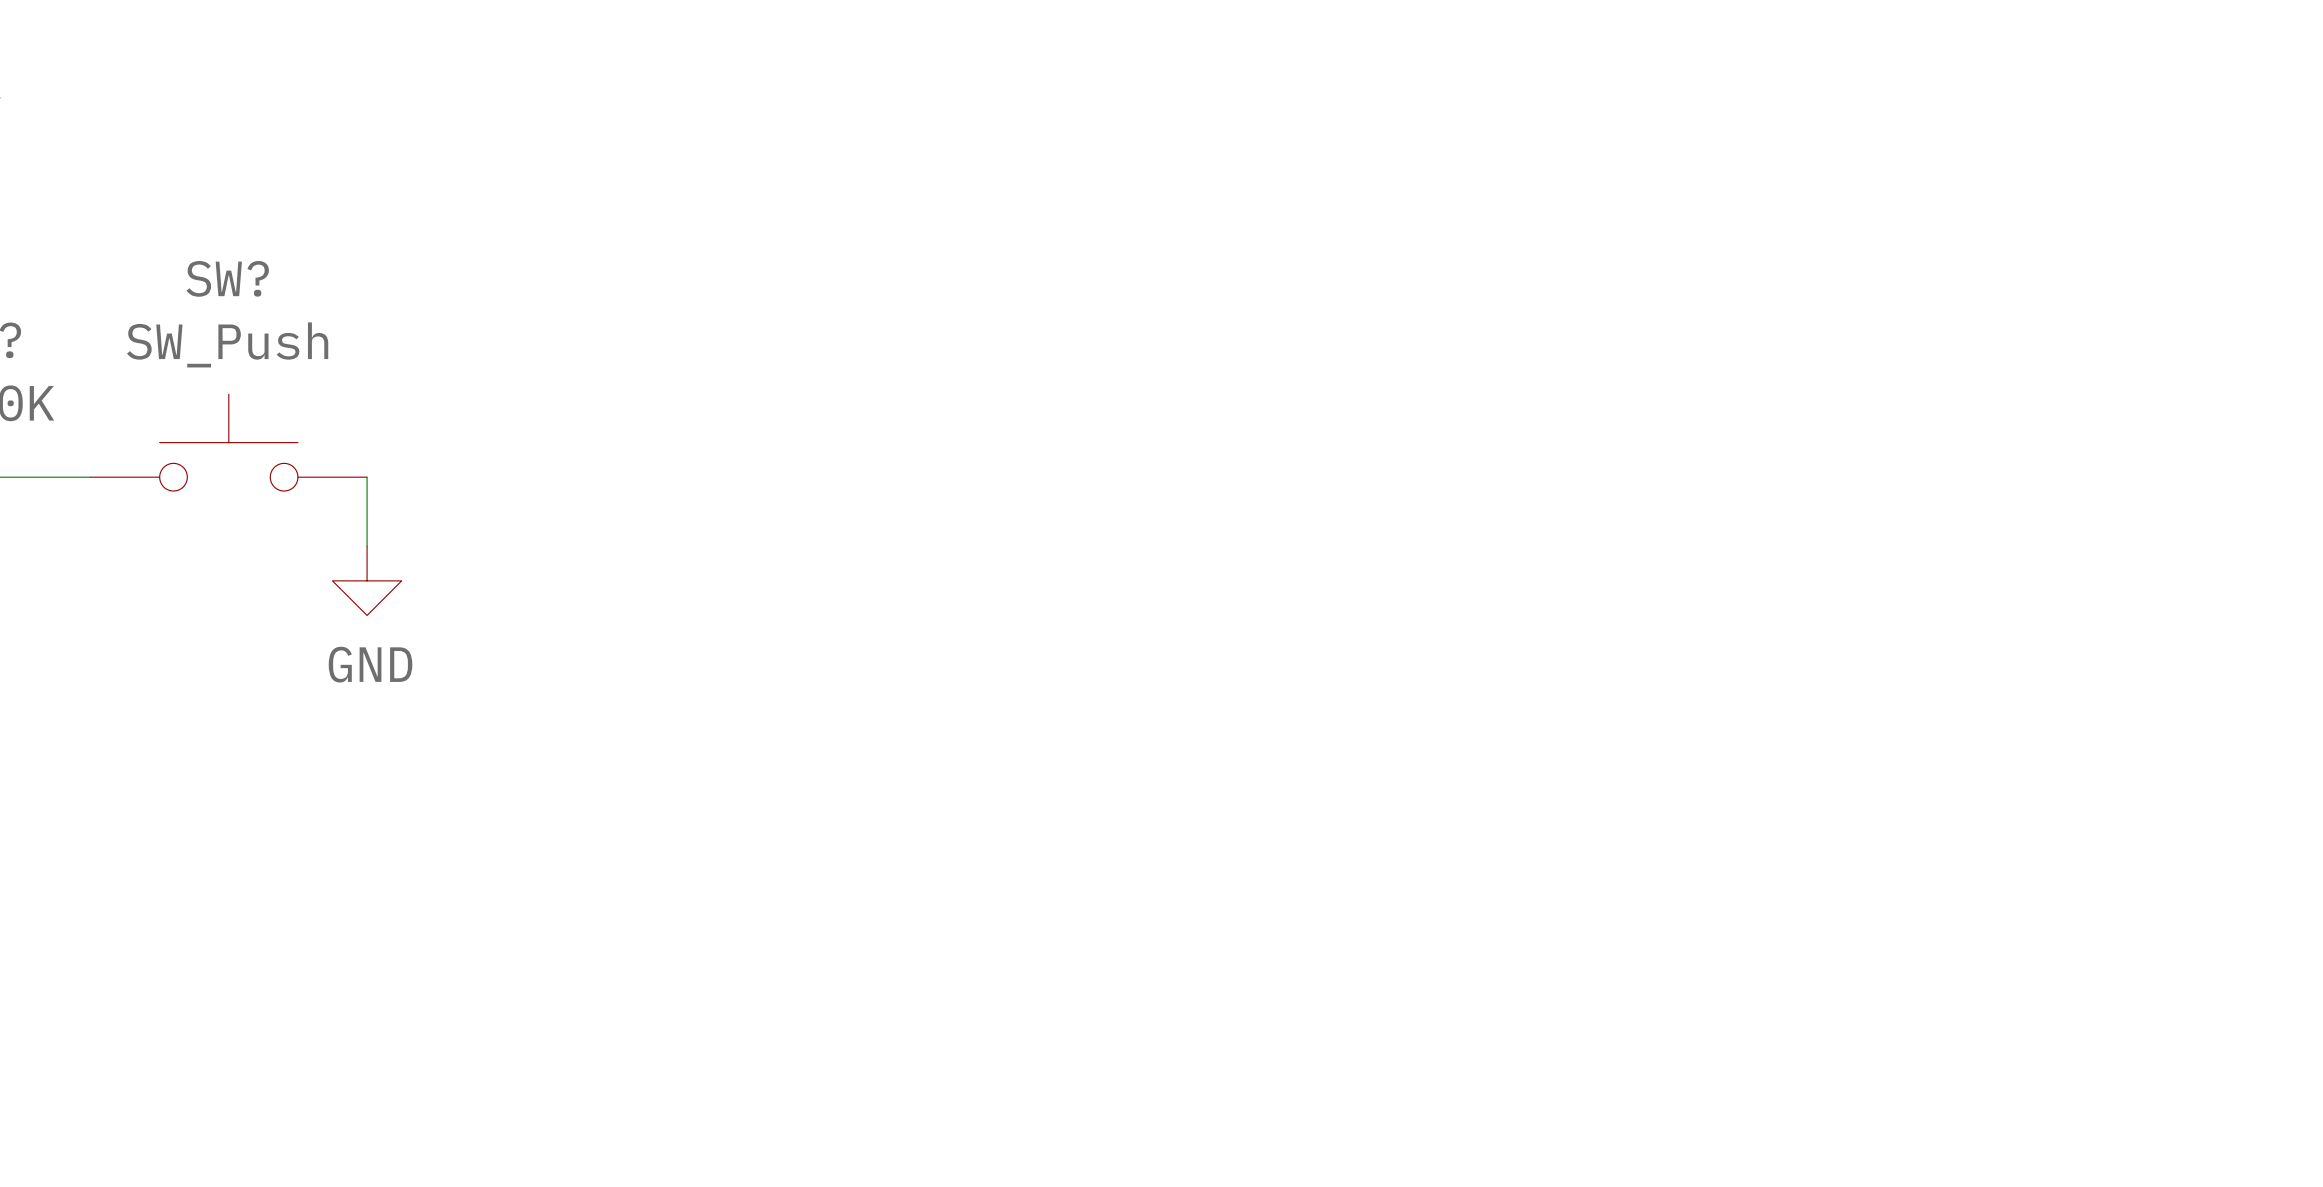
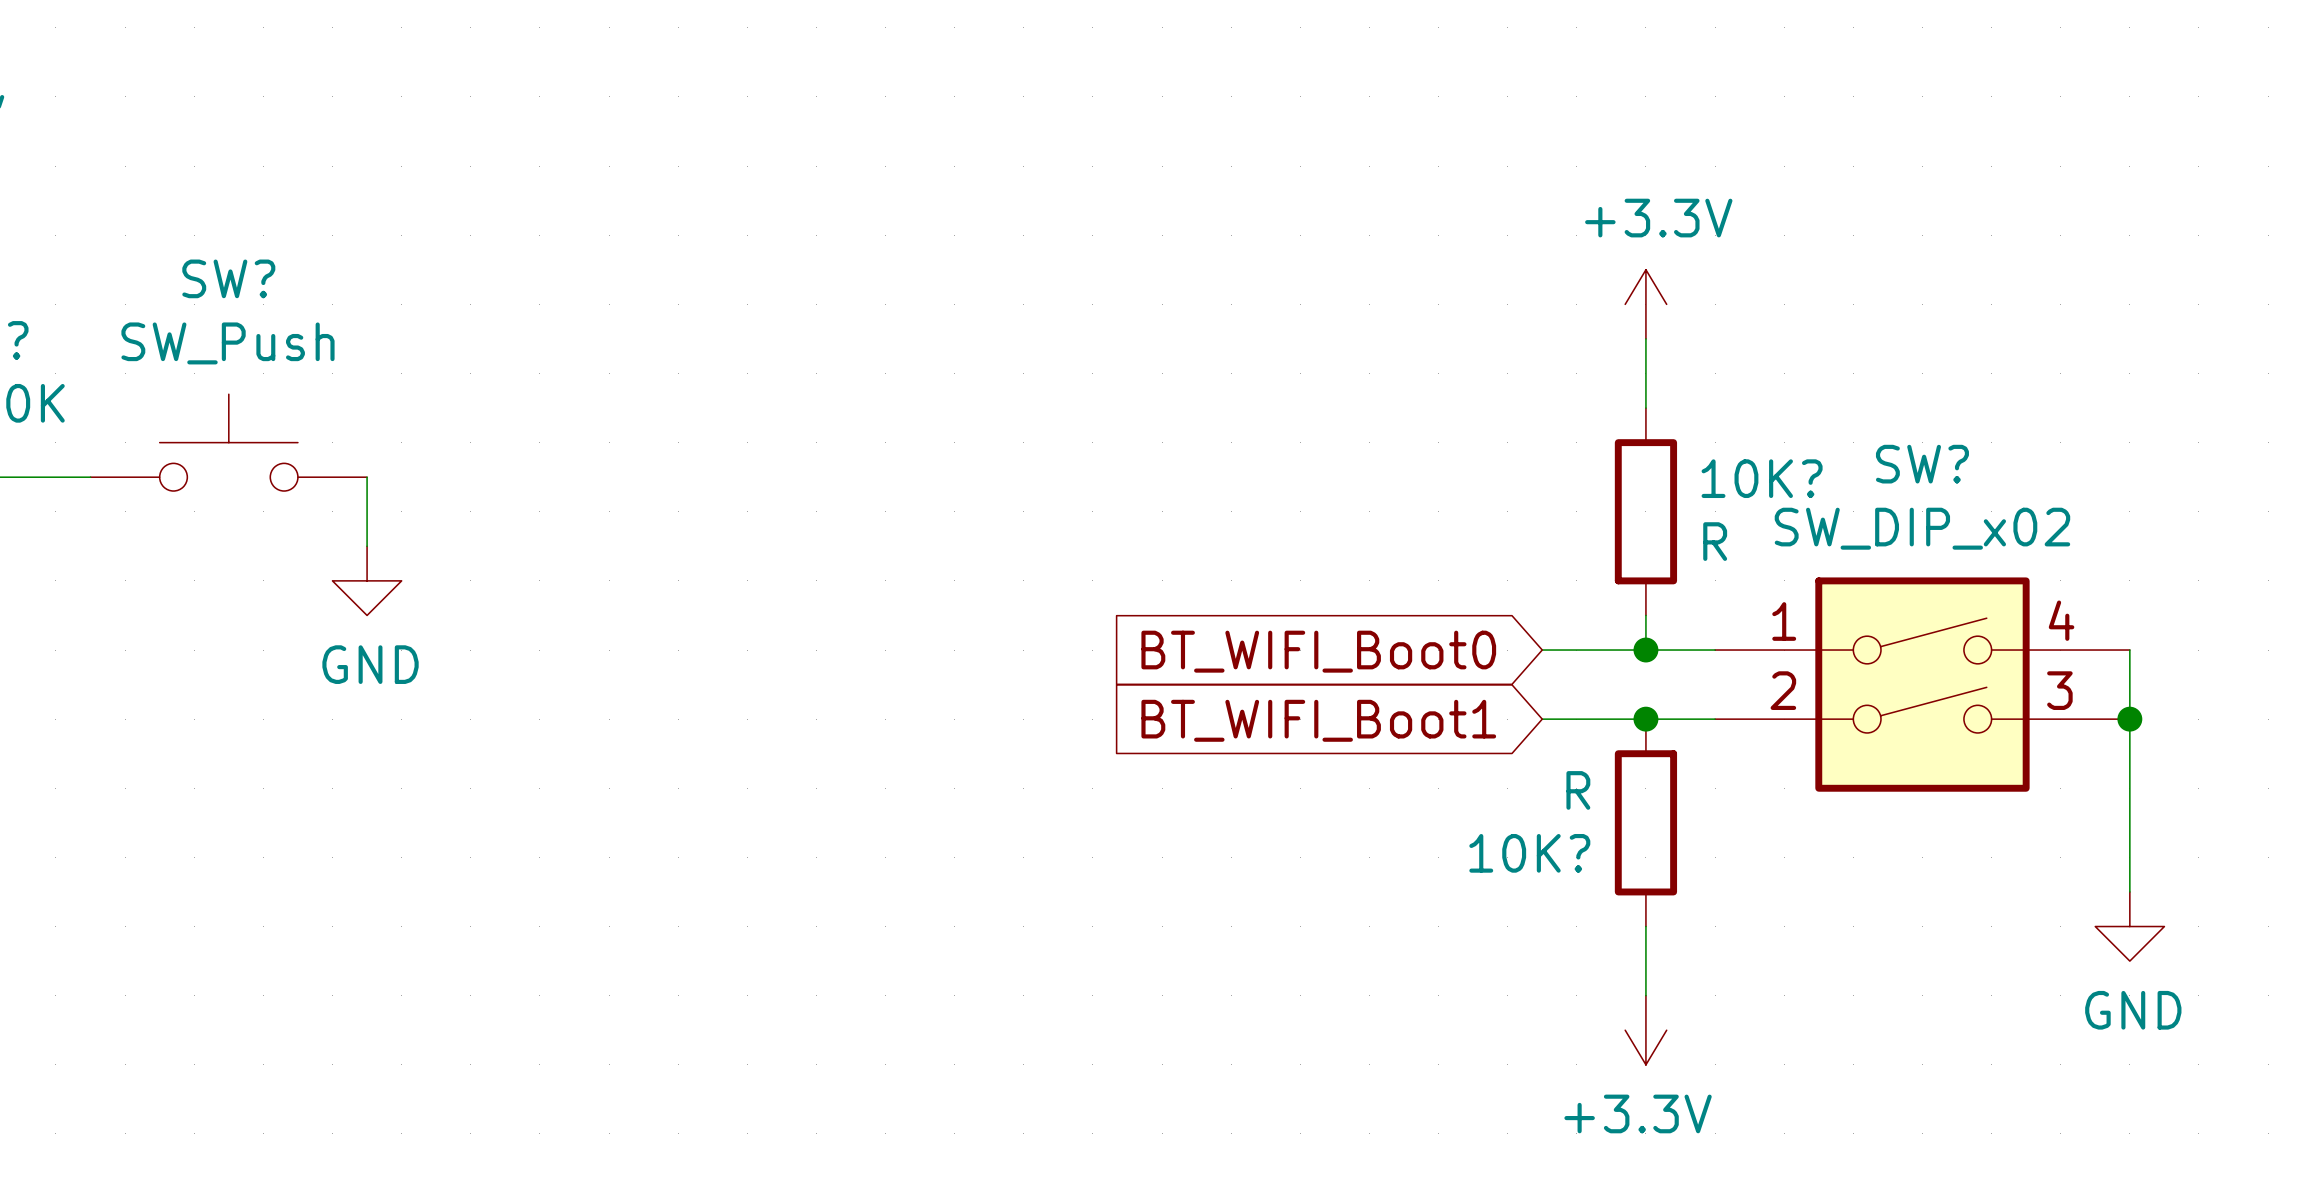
power symbol: none -> +3.3V (1645, 304)
wire: none -> (1645, 338) (1645, 408)
10K?: none -> R (1645, 511)
wire: none -> (1645, 615) (1645, 650)
wire: none -> (1542, 650) (1715, 650)
junction: none -> (1645, 650)
wire: none -> (2129, 650) (2129, 891)
global label: none -> BT_WIFI_Boot0 (1318, 651)
SW?: none -> SW_DIP_x02 (1922, 684)
wire: none -> (1542, 719) (1715, 719)
junction: none -> (1645, 719)
junction: none -> (2129, 719)
global label: none -> BT_WIFI_Boot1 (1318, 720)
10K?: none -> R (1645, 822)
wire: none -> (1645, 926) (1645, 995)
power symbol: none -> GND (2129, 926)
power symbol: none -> +3.3V (1645, 1030)

